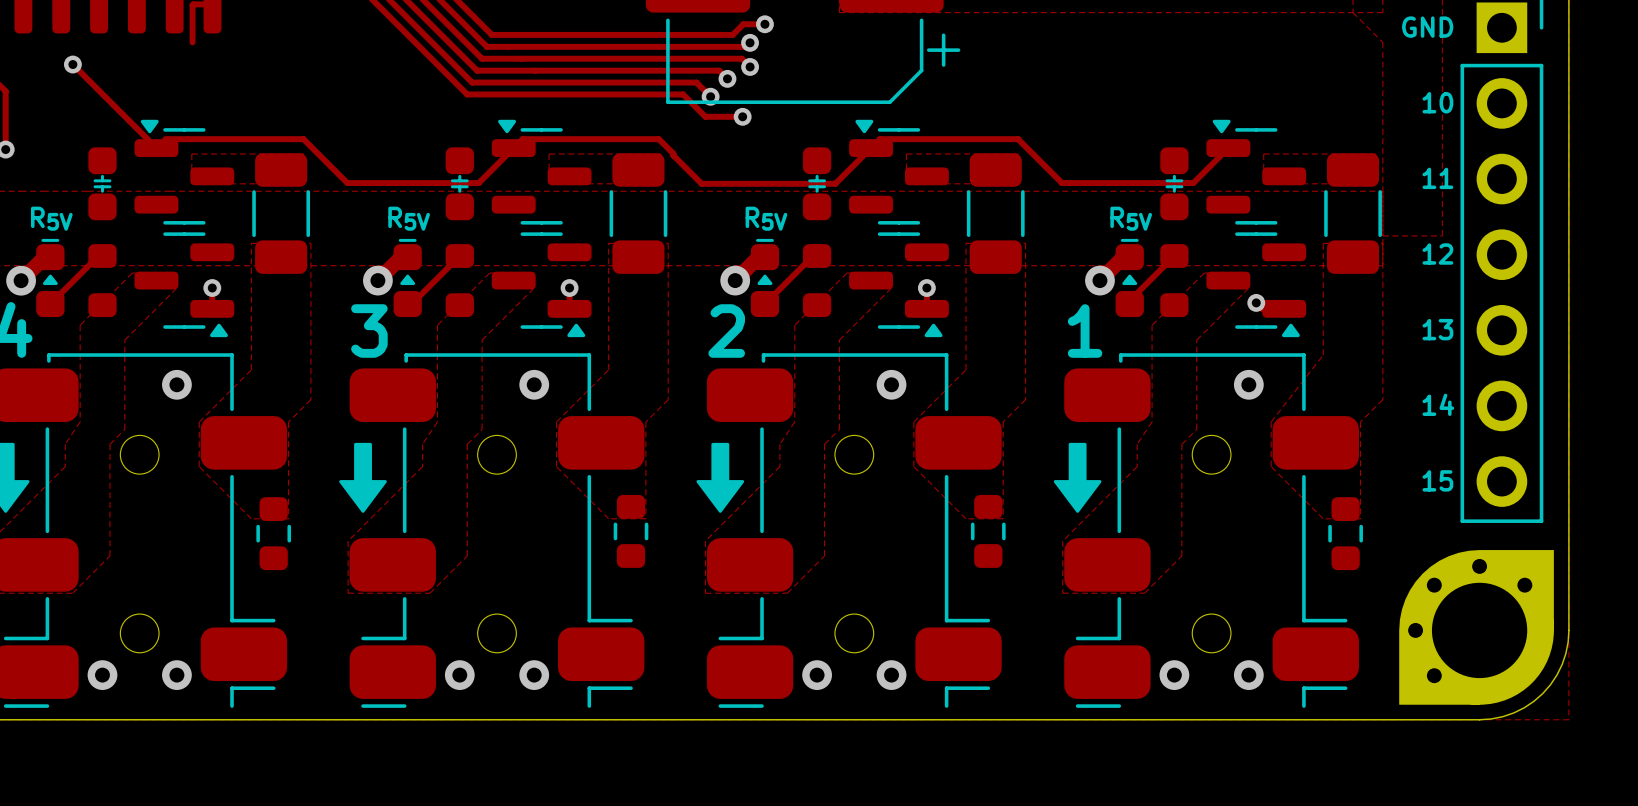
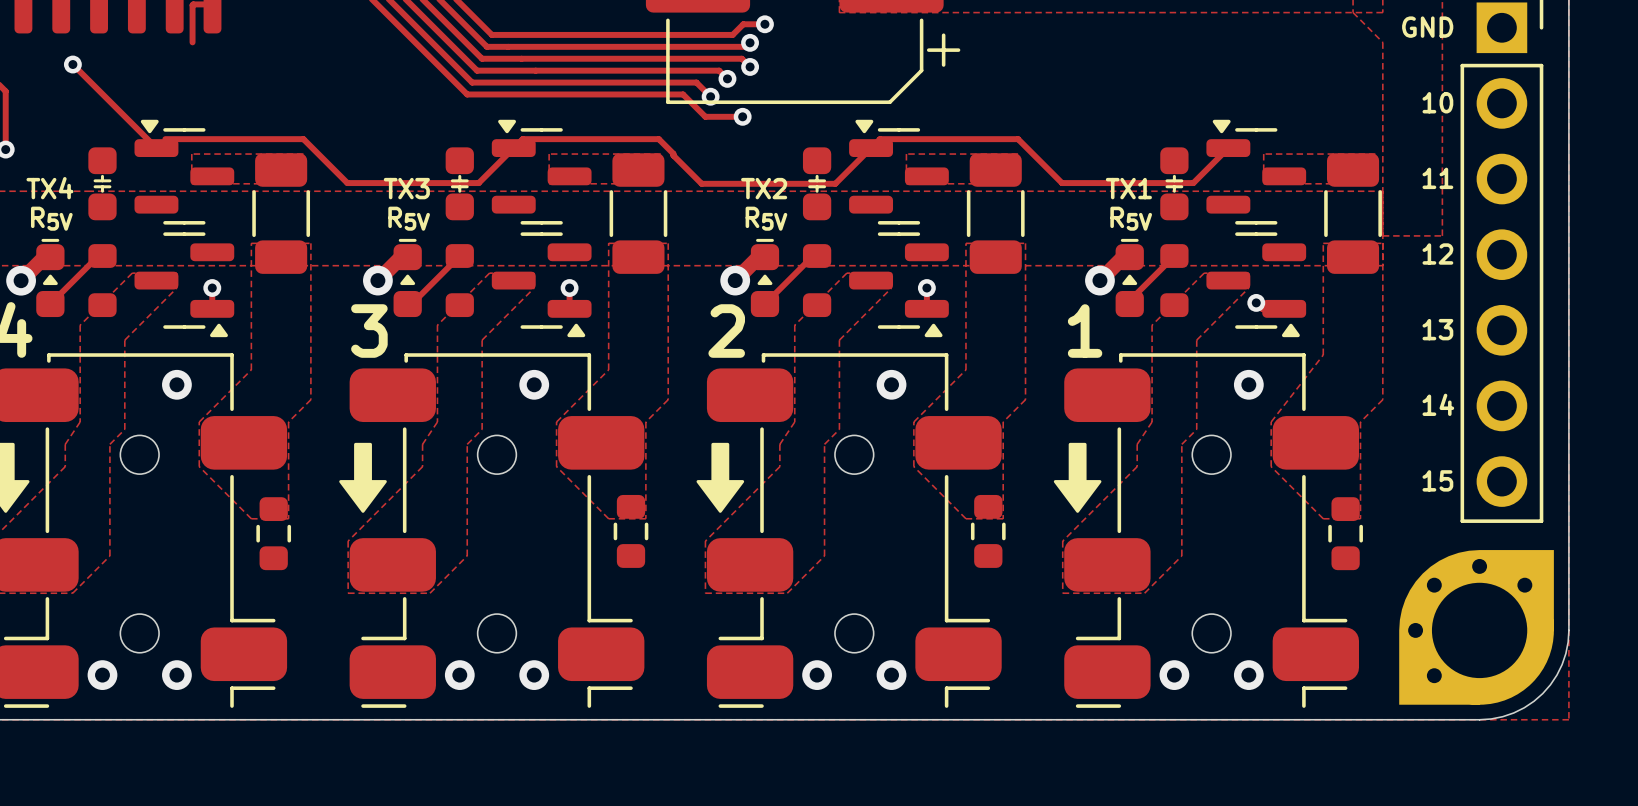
text: none -> TX4 (49, 188)
text: none -> TX3 (406, 188)
text: none -> TX2 (764, 188)
text: none -> TX1 (1128, 188)

